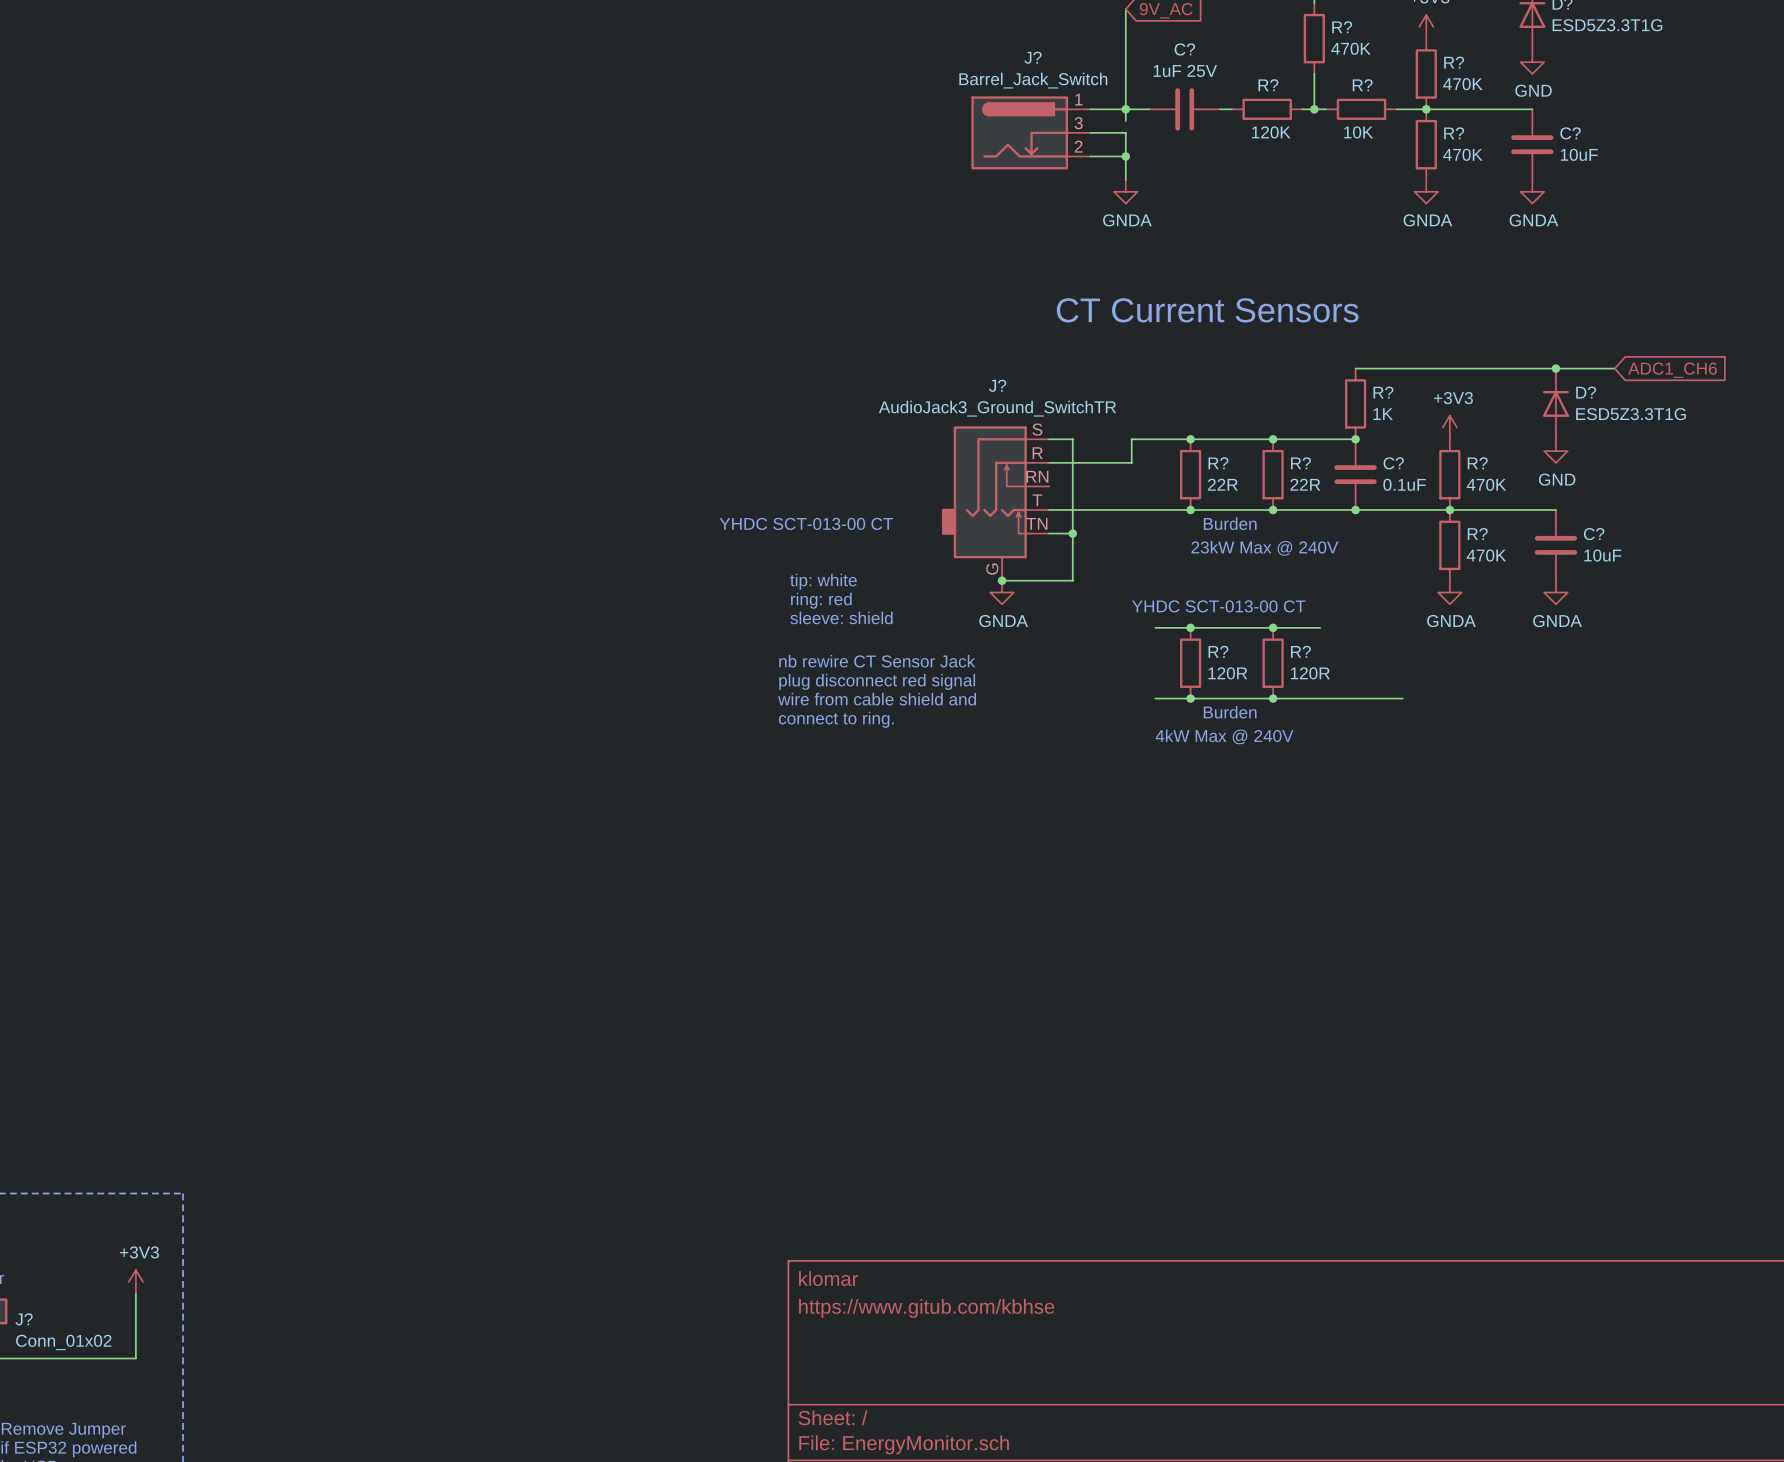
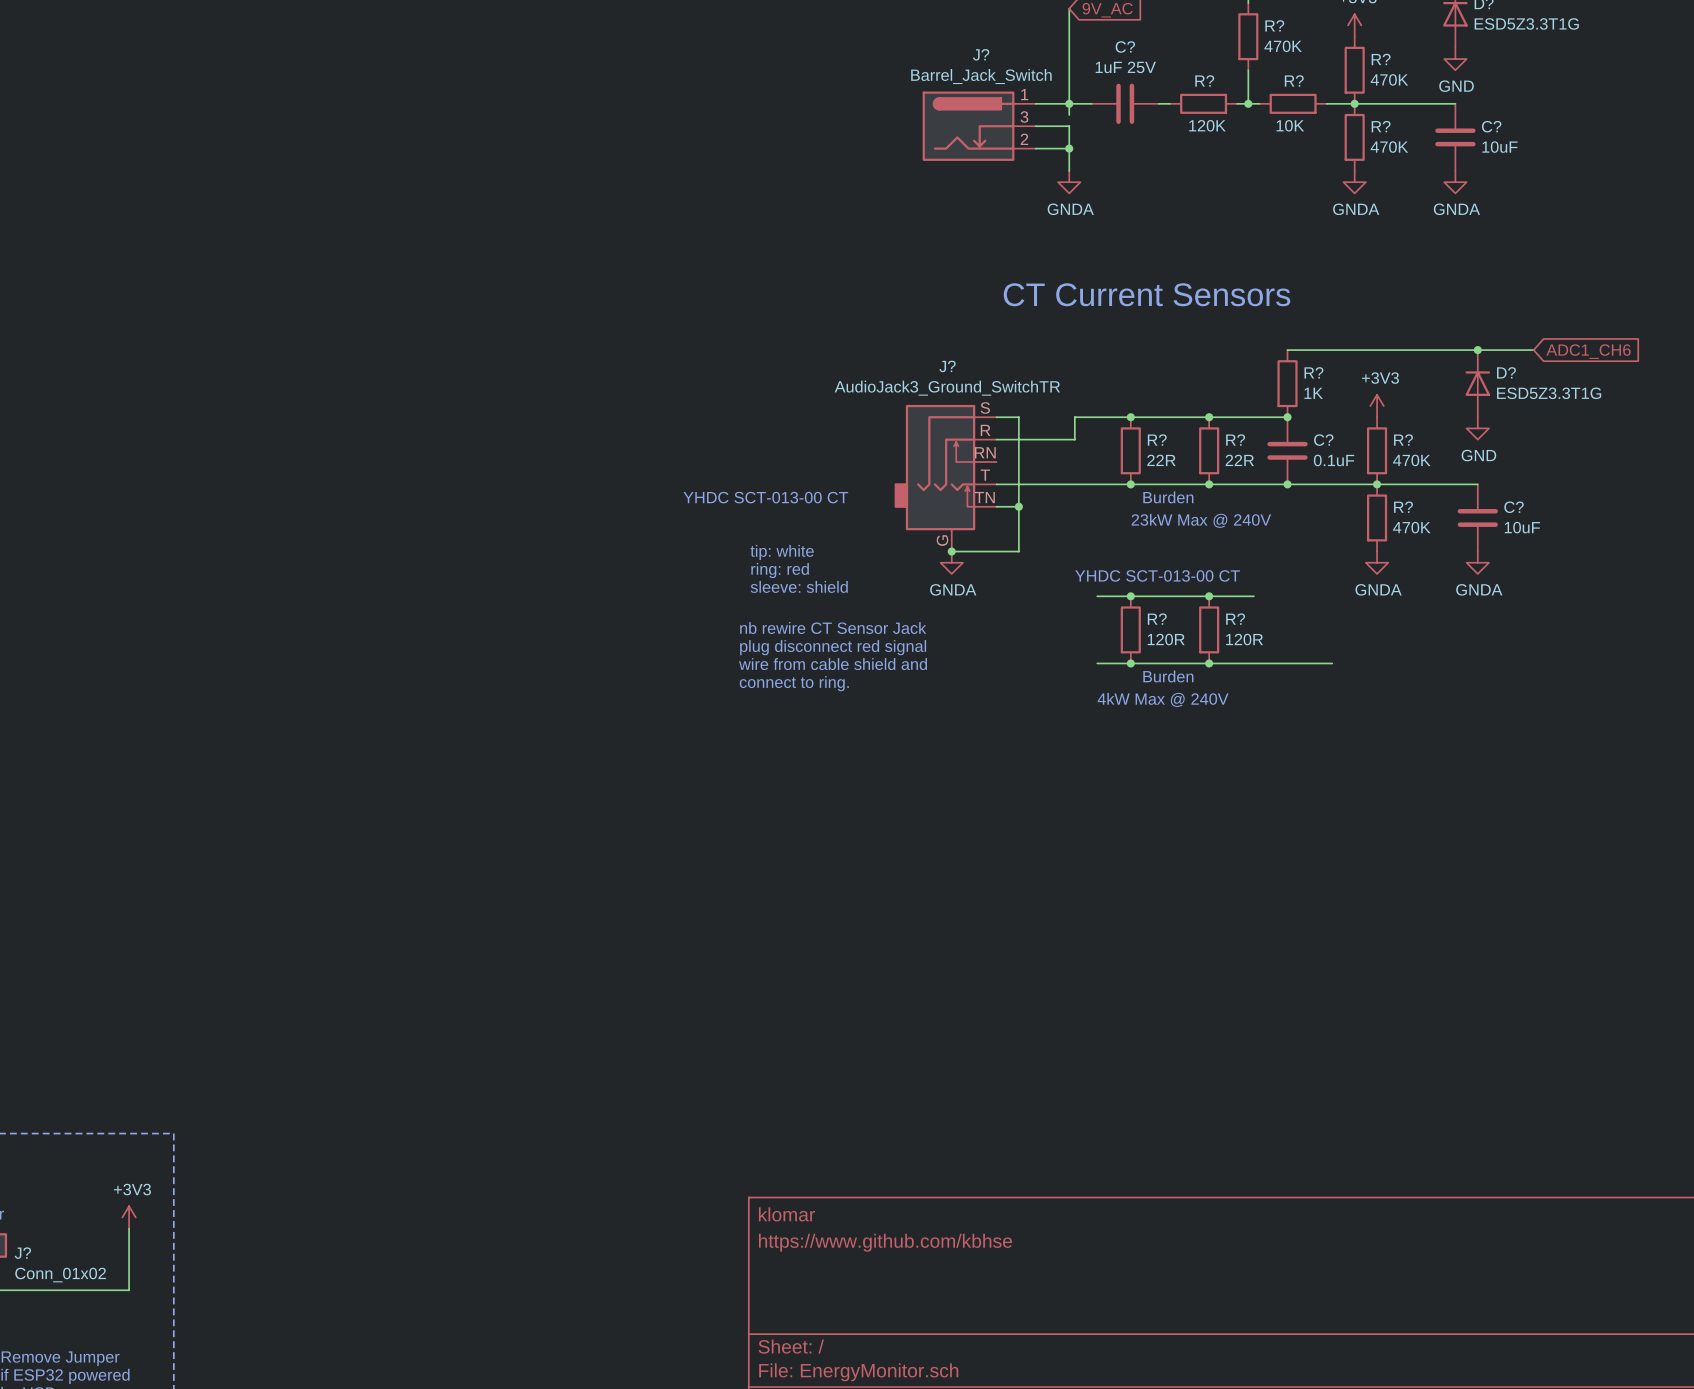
title block: https://www.gitub.com/kbhse (926, 1308) -> https://www.github.com/kbhse (885, 1242)

